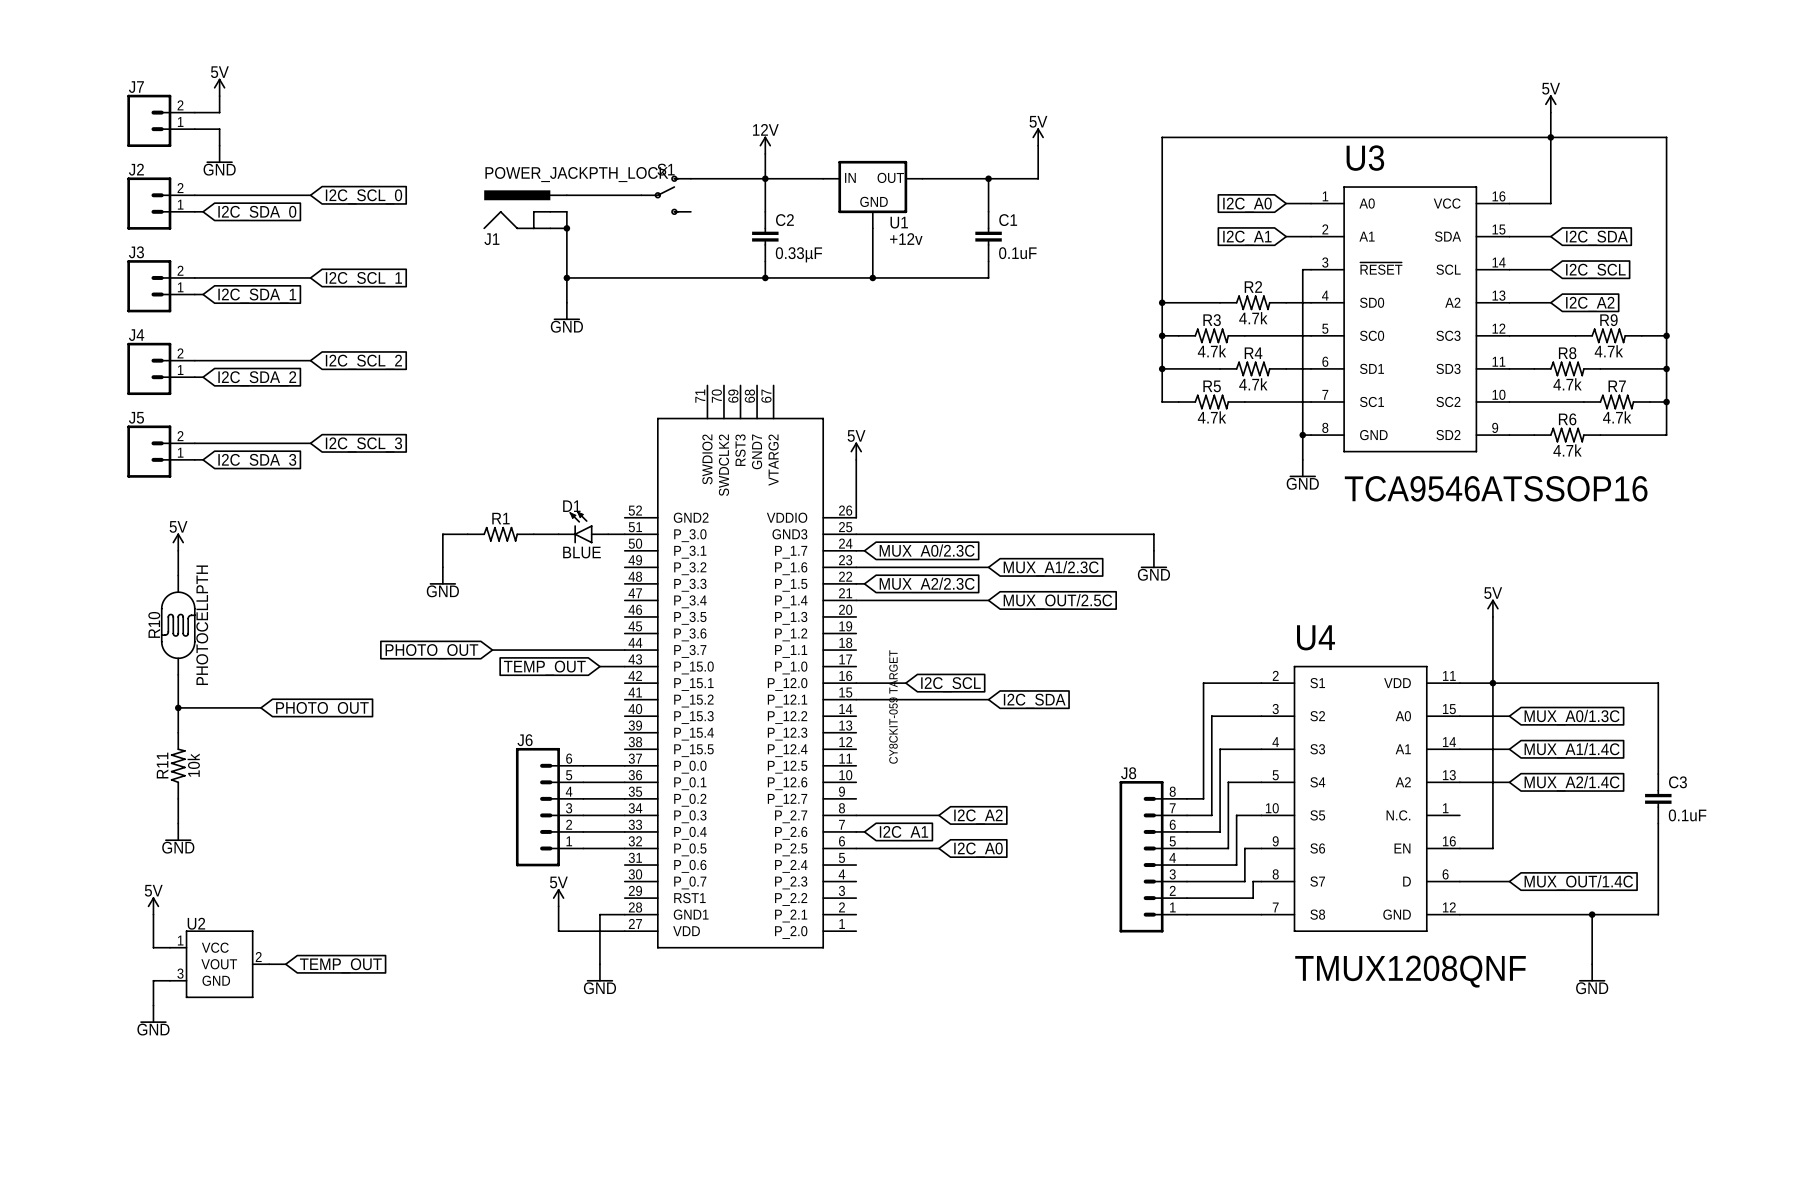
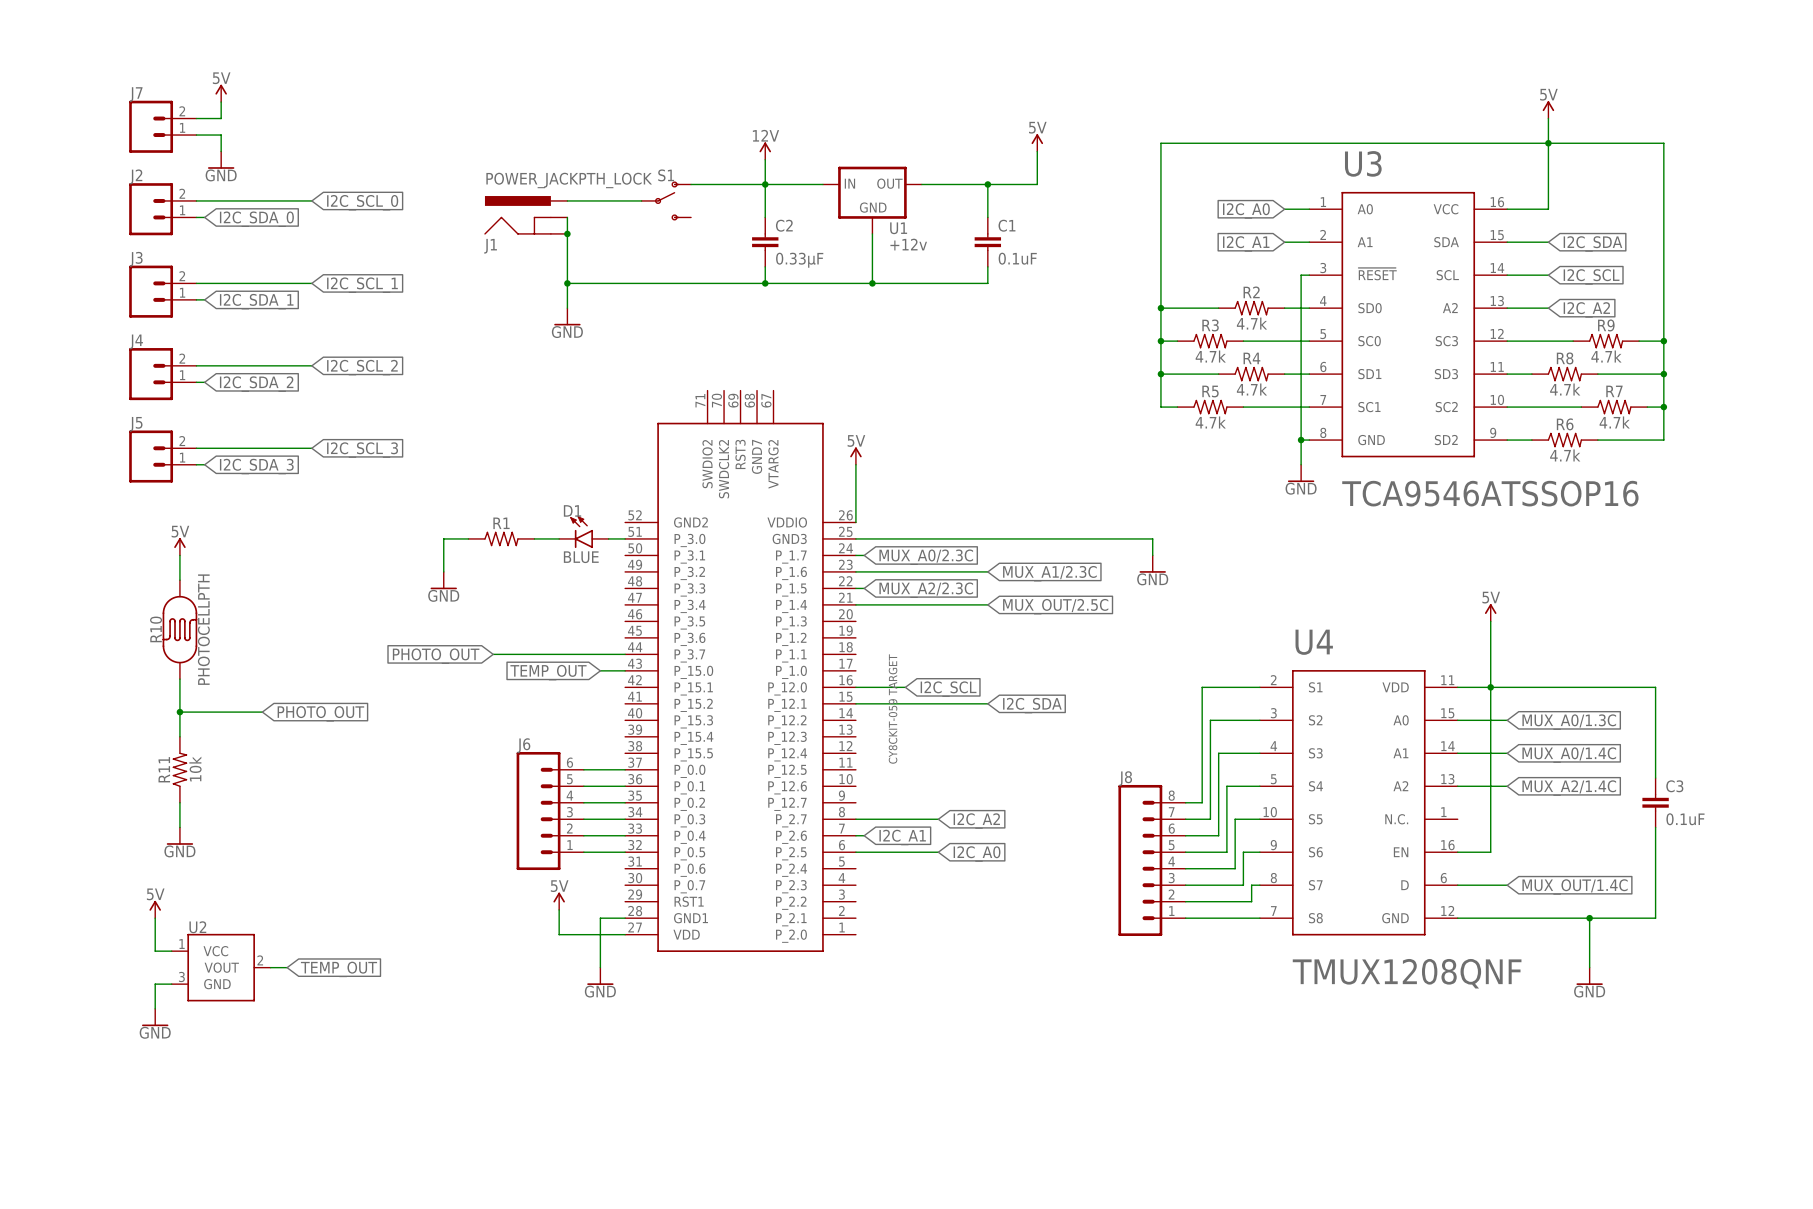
global label: MUX_A1/1.4C (1572, 750) -> MUX_A0/1.4C (1569, 755)

